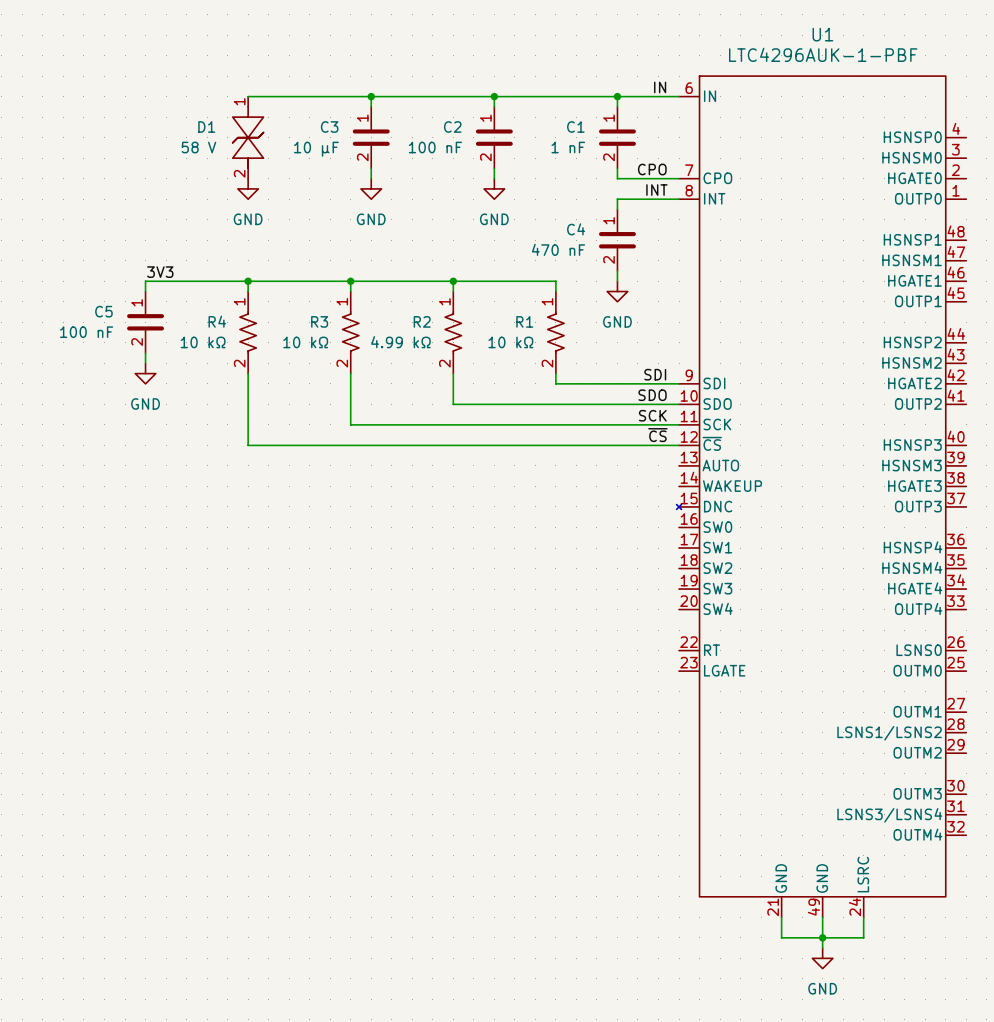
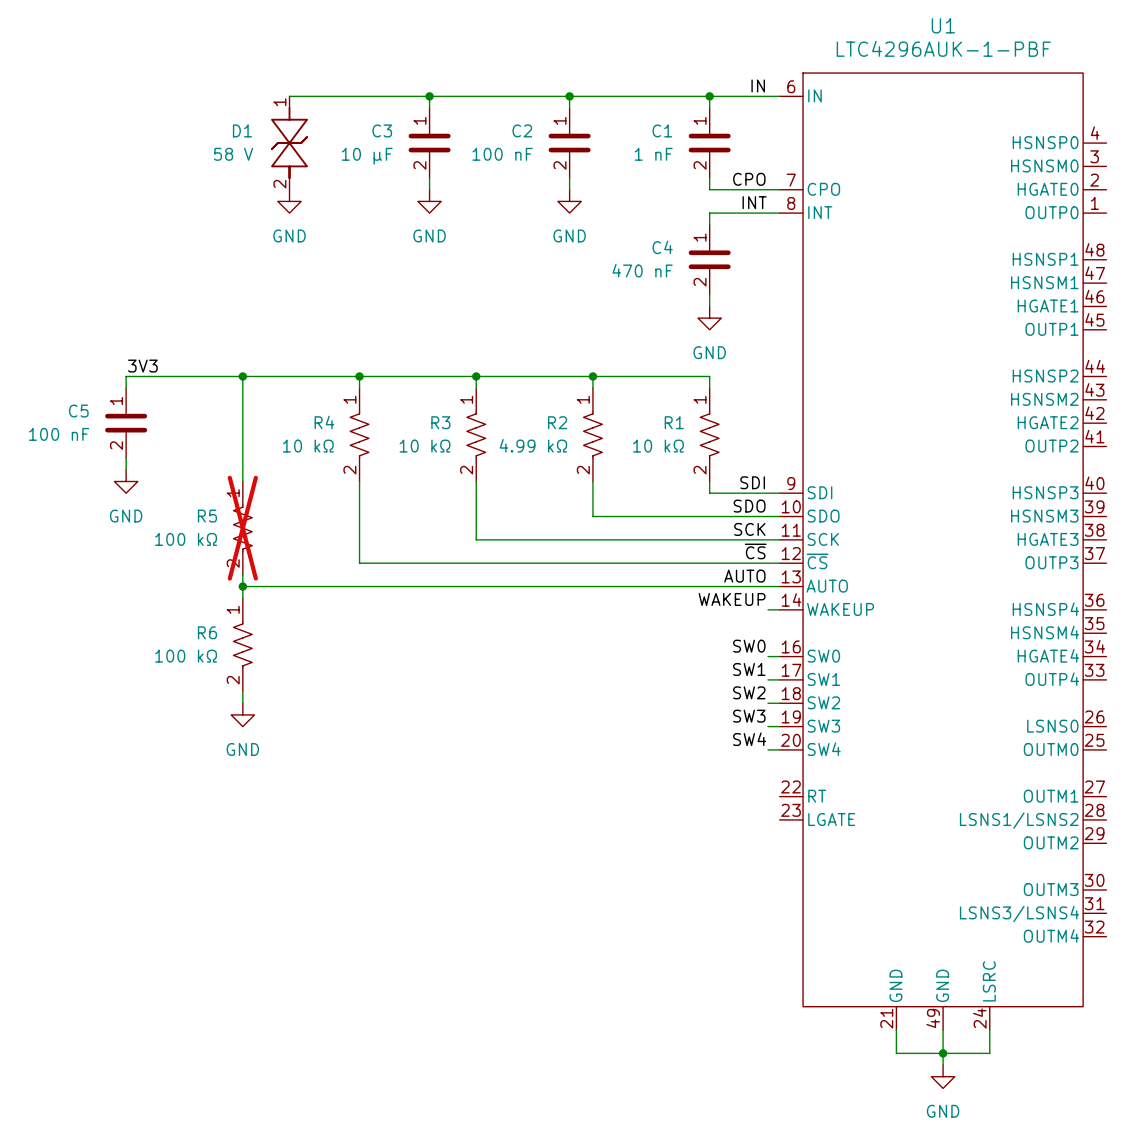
U1 symbol: [676, 76, 967, 918] -> [779, 73, 1107, 1031]
label position: 3V3 (160, 272) -> 3V3 (142, 366)
wire: (248, 281) (248, 291) -> (359, 376) (359, 388)
junction: (248, 281) -> none
wire: (350, 281) (350, 291) -> (476, 376) (476, 388)
junction: (350, 281) -> none
wire: (453, 281) (453, 291) -> (592, 376) (592, 388)
junction: (453, 281) -> none
wire: (145, 291) (145, 281) (555, 281) (555, 291) -> none
C5 position: (145, 322) -> (126, 423)
R4 position: (248, 332) -> (359, 434)
R3 position: (350, 332) -> (476, 434)
R2 position: (453, 332) -> (592, 434)
R1 position: (555, 332) -> (709, 434)
wire: none -> (242, 376) (242, 481)
junction: none -> (242, 376)
junction: none -> (359, 376)
junction: none -> (476, 376)
junction: none -> (592, 376)
wire: none -> (126, 388) (126, 376) (709, 376) (709, 388)
wire: (145, 353) (145, 363) -> (126, 458) (126, 469)
power symbol position: GND (145, 373) -> GND (126, 481)
wire: (248, 373) (248, 445) (617, 445) -> (709, 481) (709, 493)
wire: (350, 373) (350, 424) (679, 424) -> none
wire: (453, 373) (453, 404) (679, 404) -> none
wire: (555, 373) (555, 383) (679, 383) -> none
label: SDI (655, 374) -> none
label position: SDO (652, 395) -> SDO (749, 506)
label position: SCK (652, 415) -> SCK (749, 529)
wire: none -> (359, 481) (359, 563) (779, 563)
wire: none -> (476, 481) (476, 539) (779, 539)
wire: none -> (592, 481) (592, 516) (779, 516)
label: ~{CS} (657, 435) -> SDI (752, 482)
R5: none -> 100 kΩ (242, 528)
label: none -> ~{CS} (755, 551)
wire: none -> (242, 574) (242, 598)
label: none -> AUTO (744, 576)
wire: none -> (242, 586) (779, 586)
junction: none -> (242, 586)
label: none -> WAKEUP (732, 599)
wire: none -> (768, 609) (779, 609)
R6: none -> 100 kΩ (242, 644)
label: none -> SW0 (749, 646)
wire: none -> (768, 656) (779, 656)
label: none -> SW1 (749, 669)
wire: none -> (768, 679) (779, 679)
wire: none -> (242, 691) (242, 703)
label: none -> SW2 (749, 692)
wire: none -> (768, 703) (779, 703)
power symbol: none -> GND (242, 714)
label: none -> SW3 (749, 716)
wire: none -> (768, 726) (779, 726)
label: none -> SW4 (749, 739)
wire: none -> (768, 749) (779, 749)

